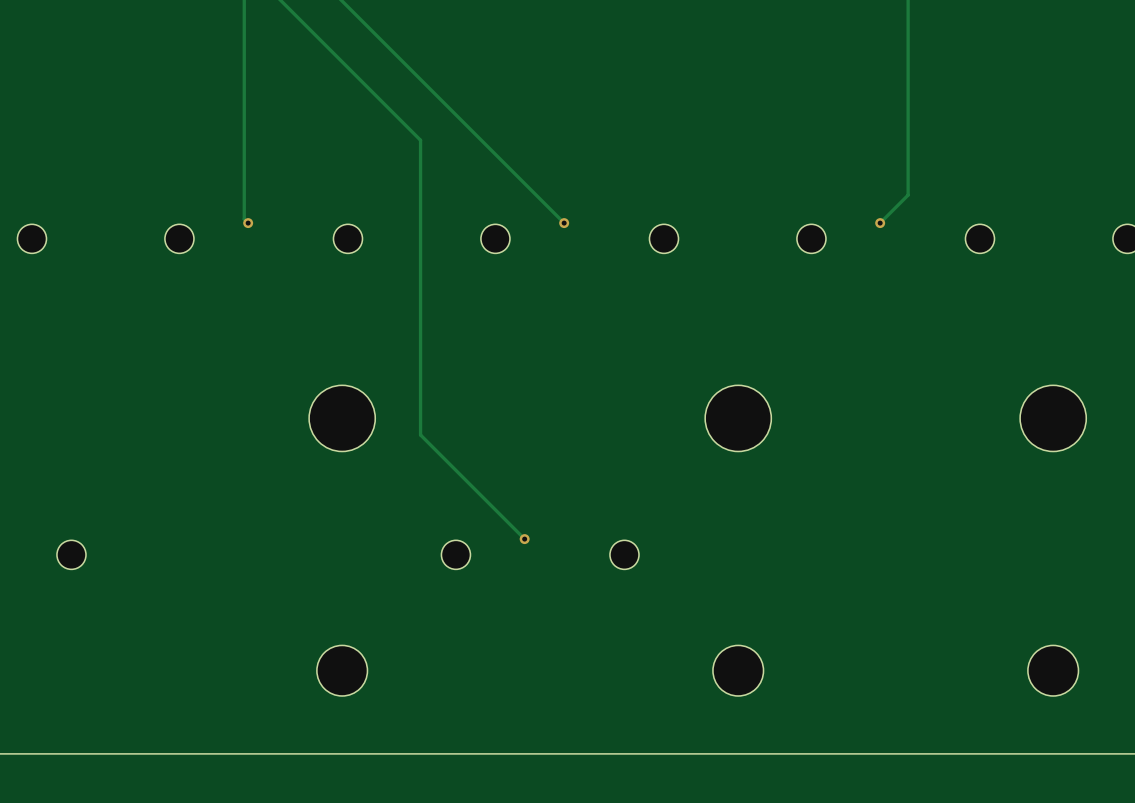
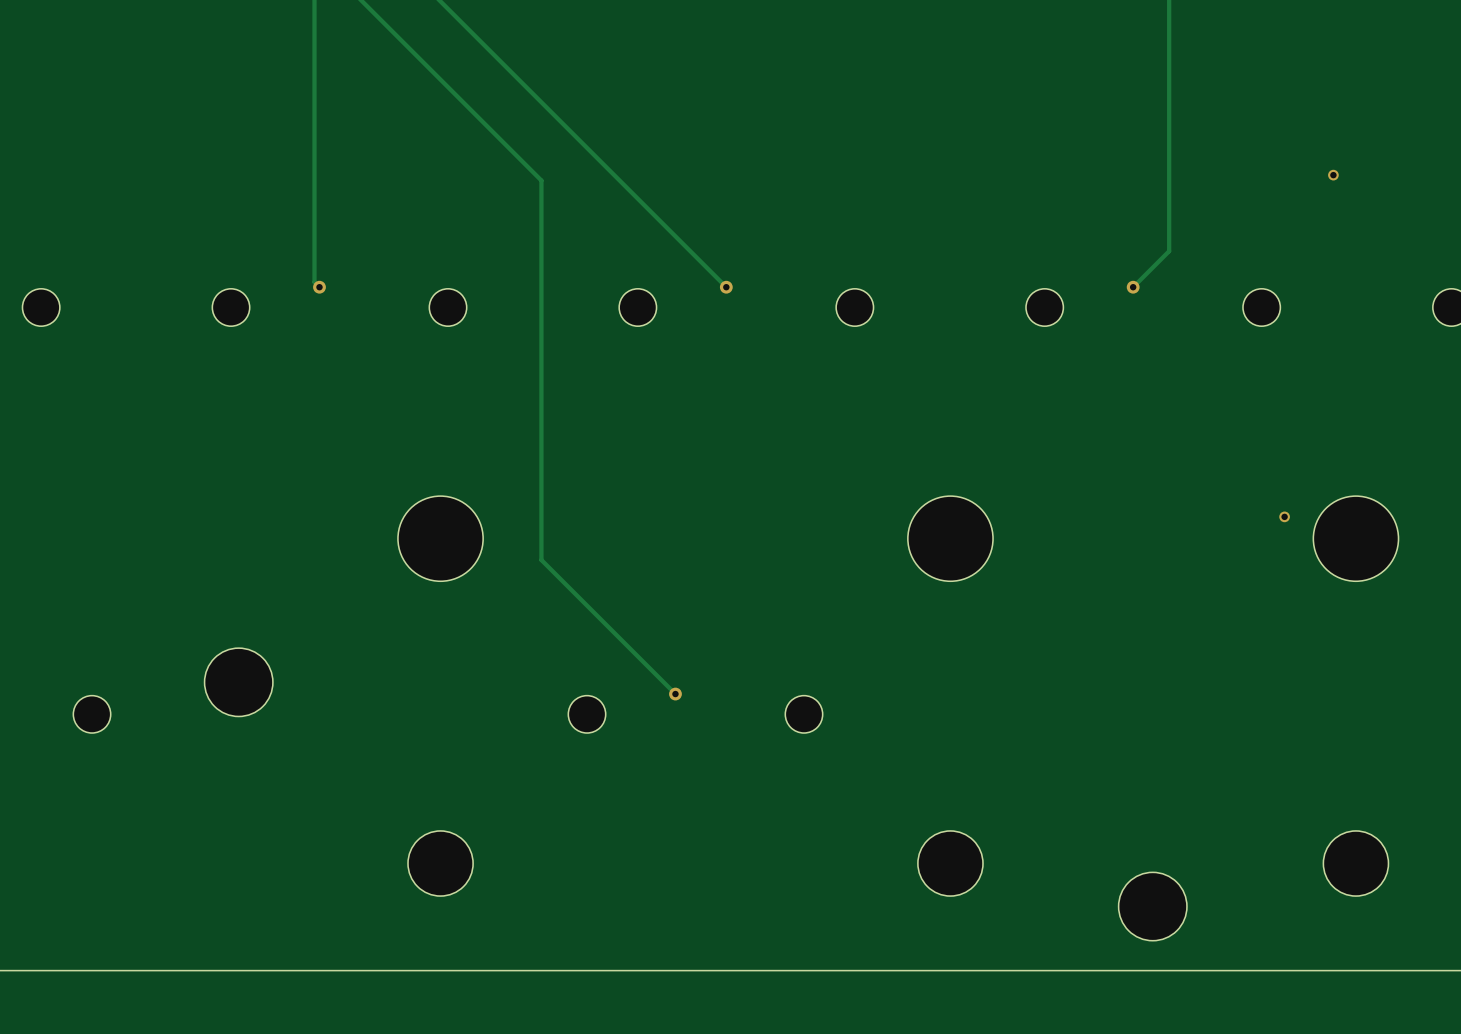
via: none -> (1333, 175)
via: none -> (1284, 516)
part: none -> (238, 682)
part: none -> (1152, 906)

